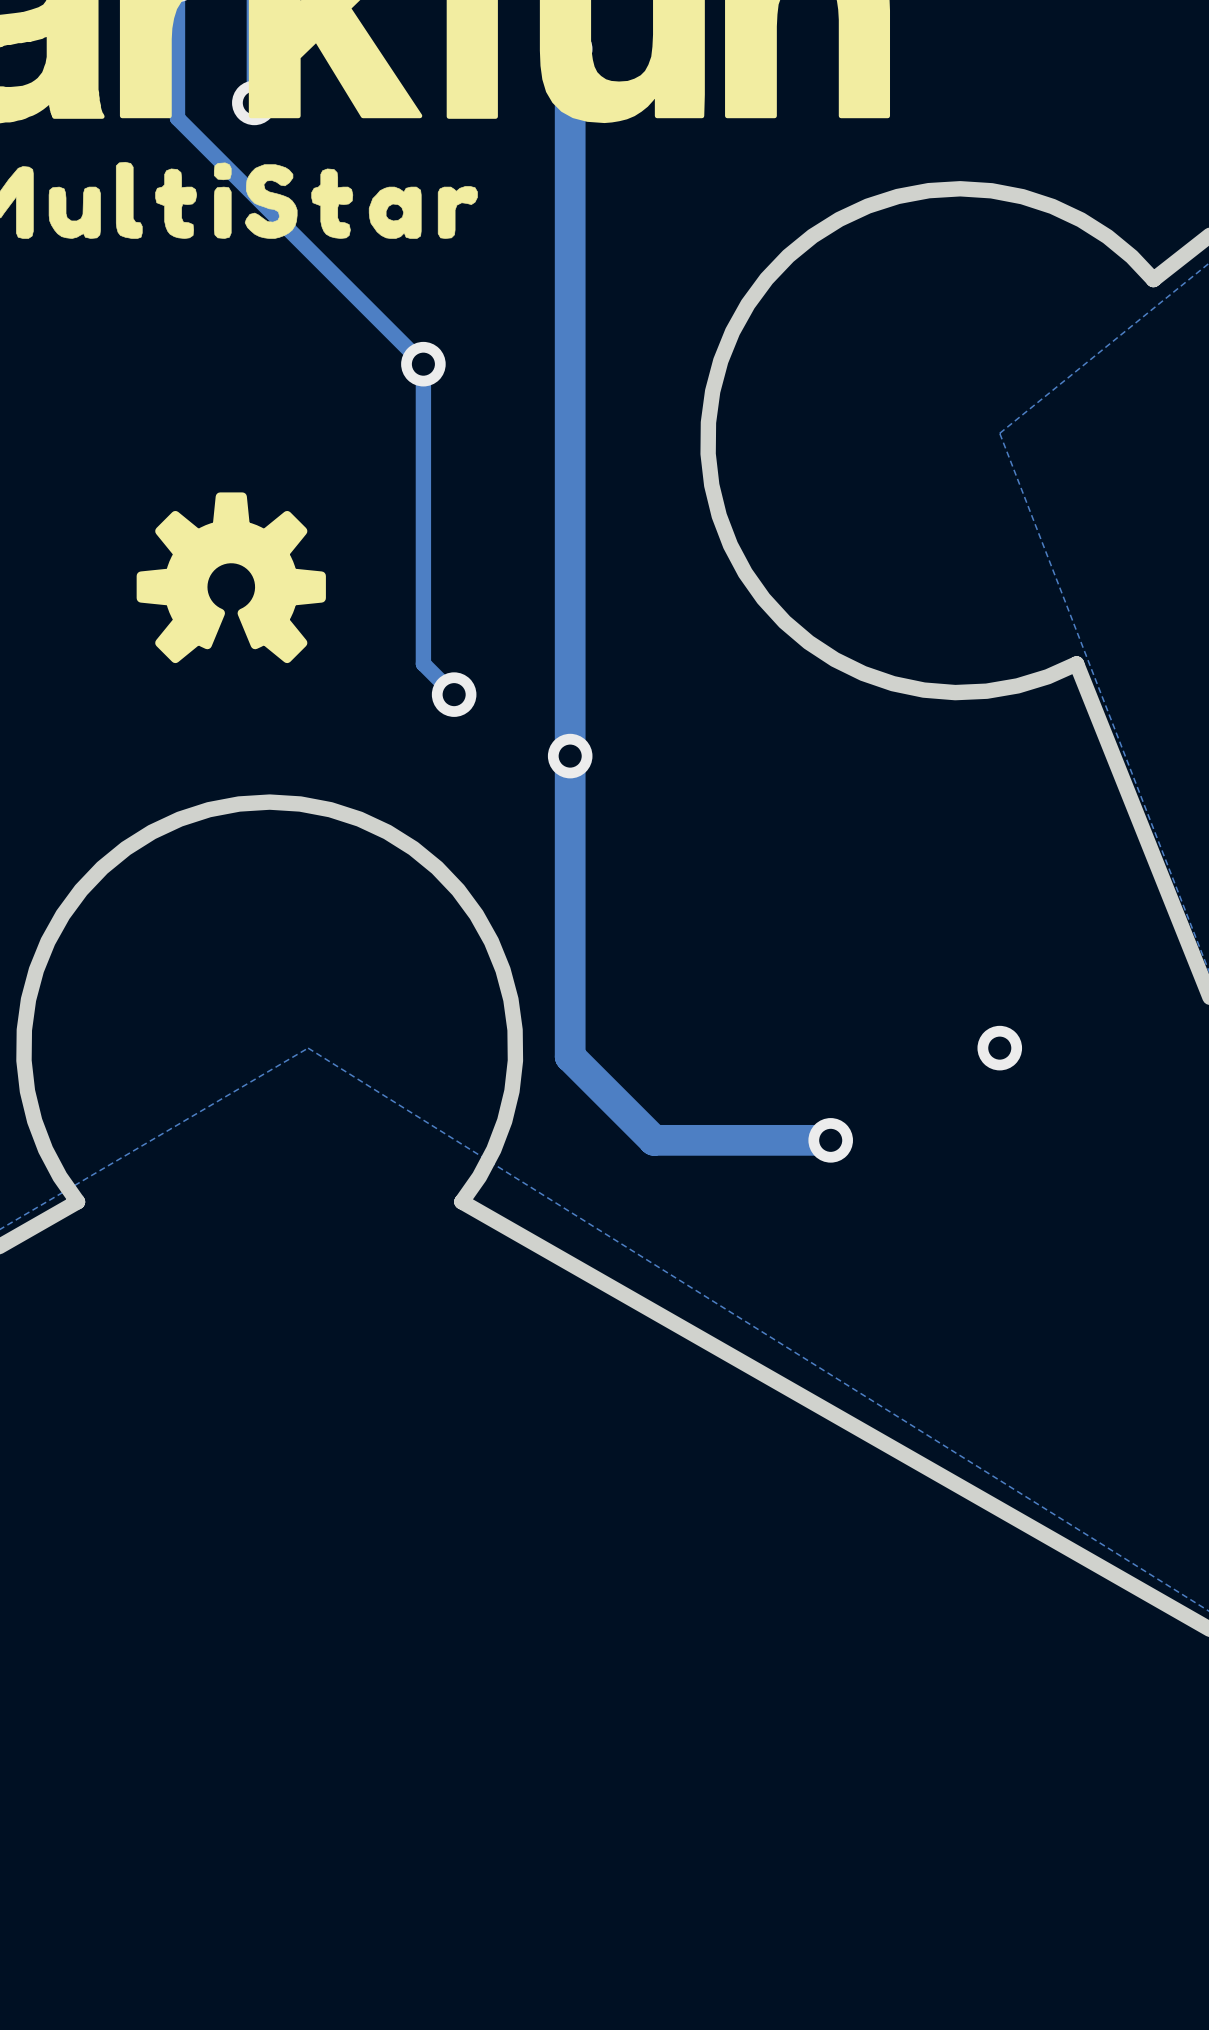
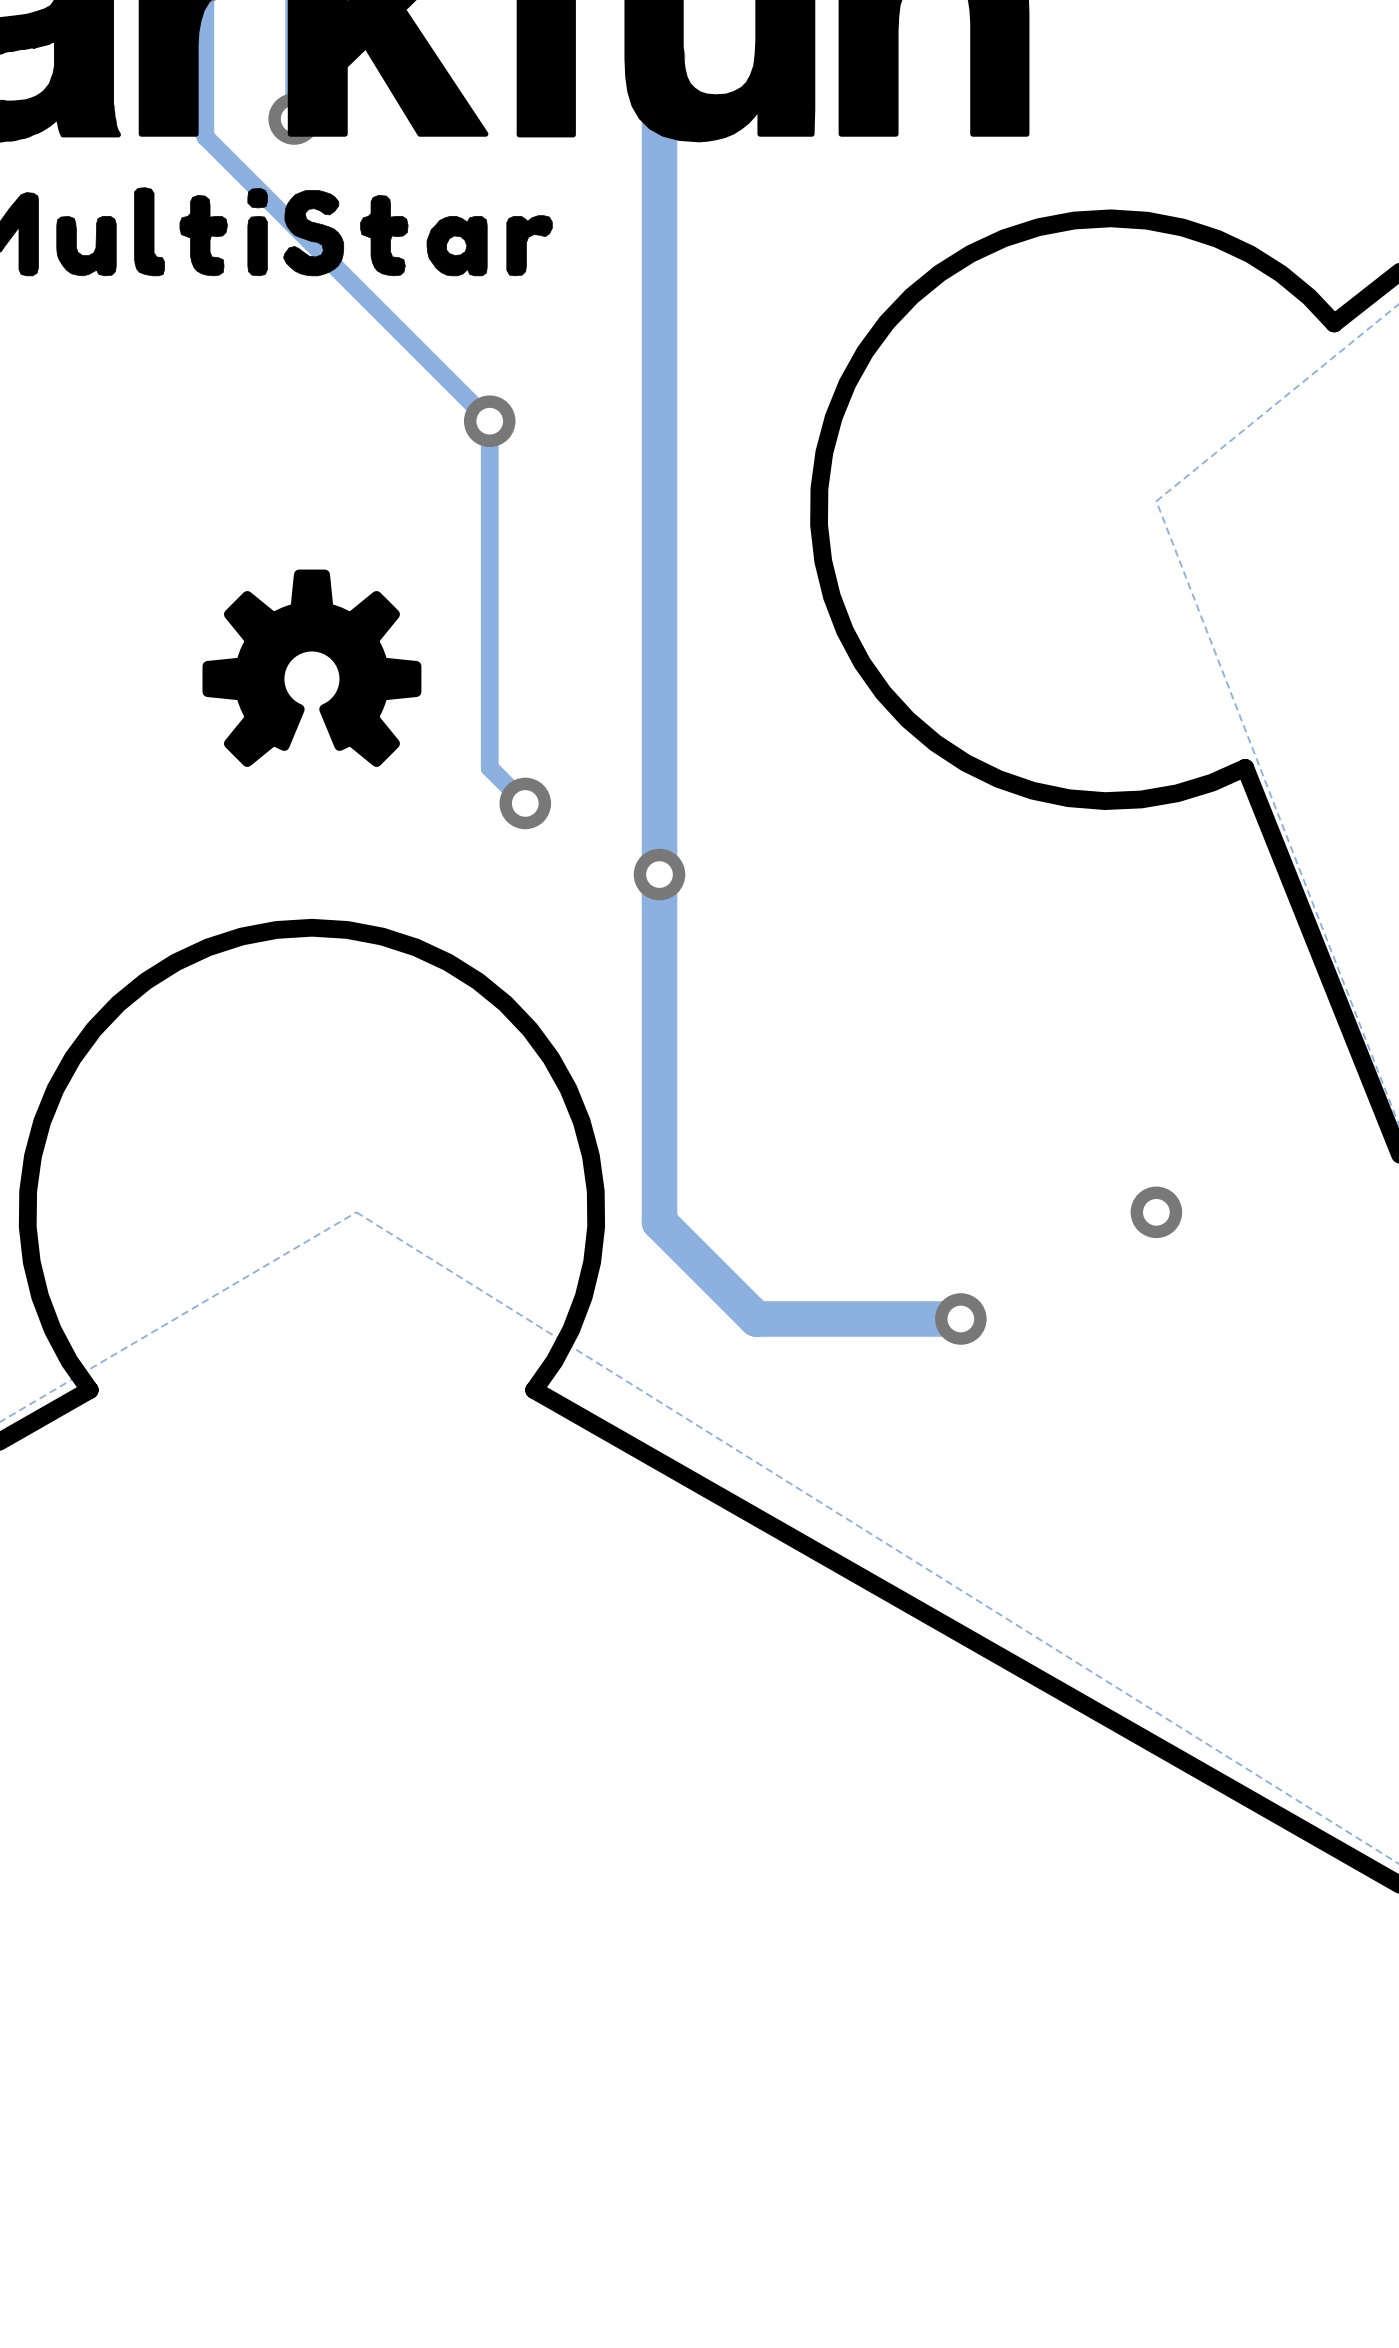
drawing position: (231, 577) -> (311, 668)

